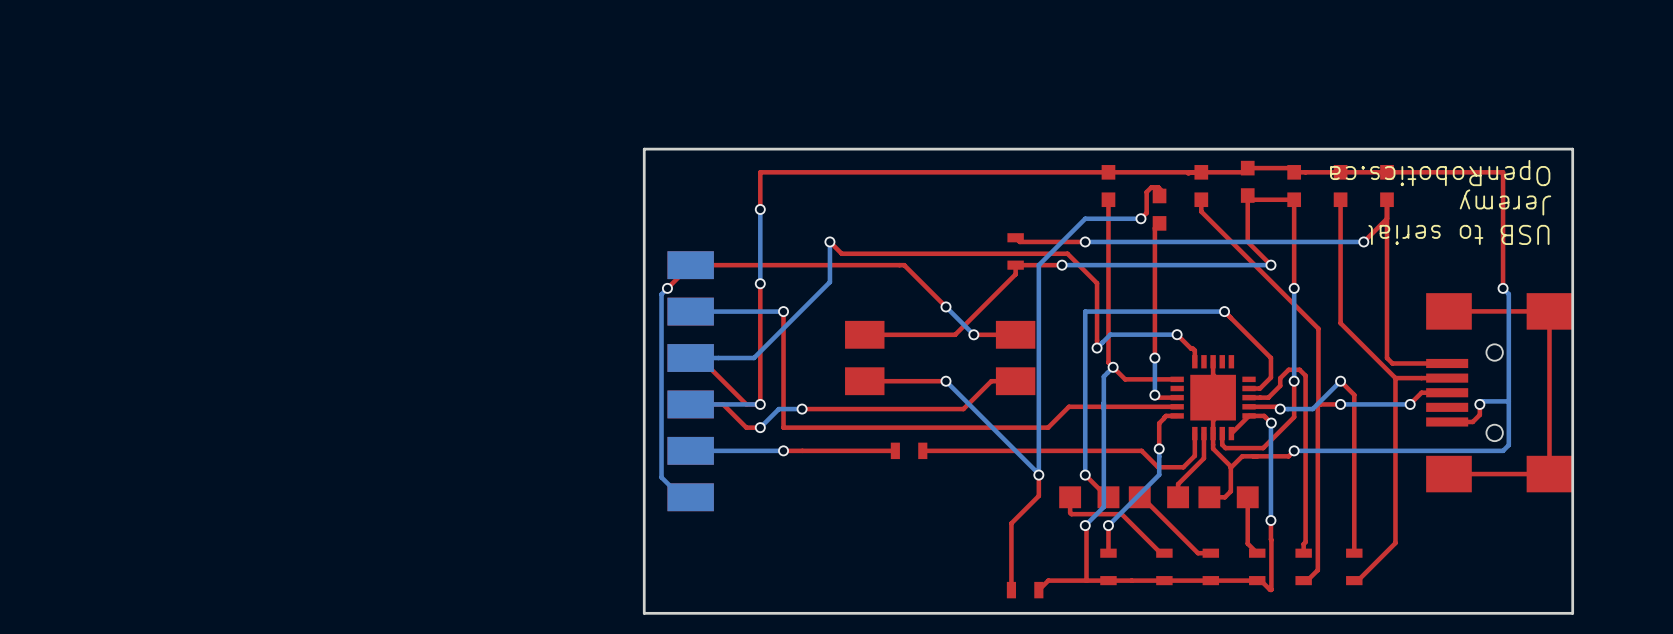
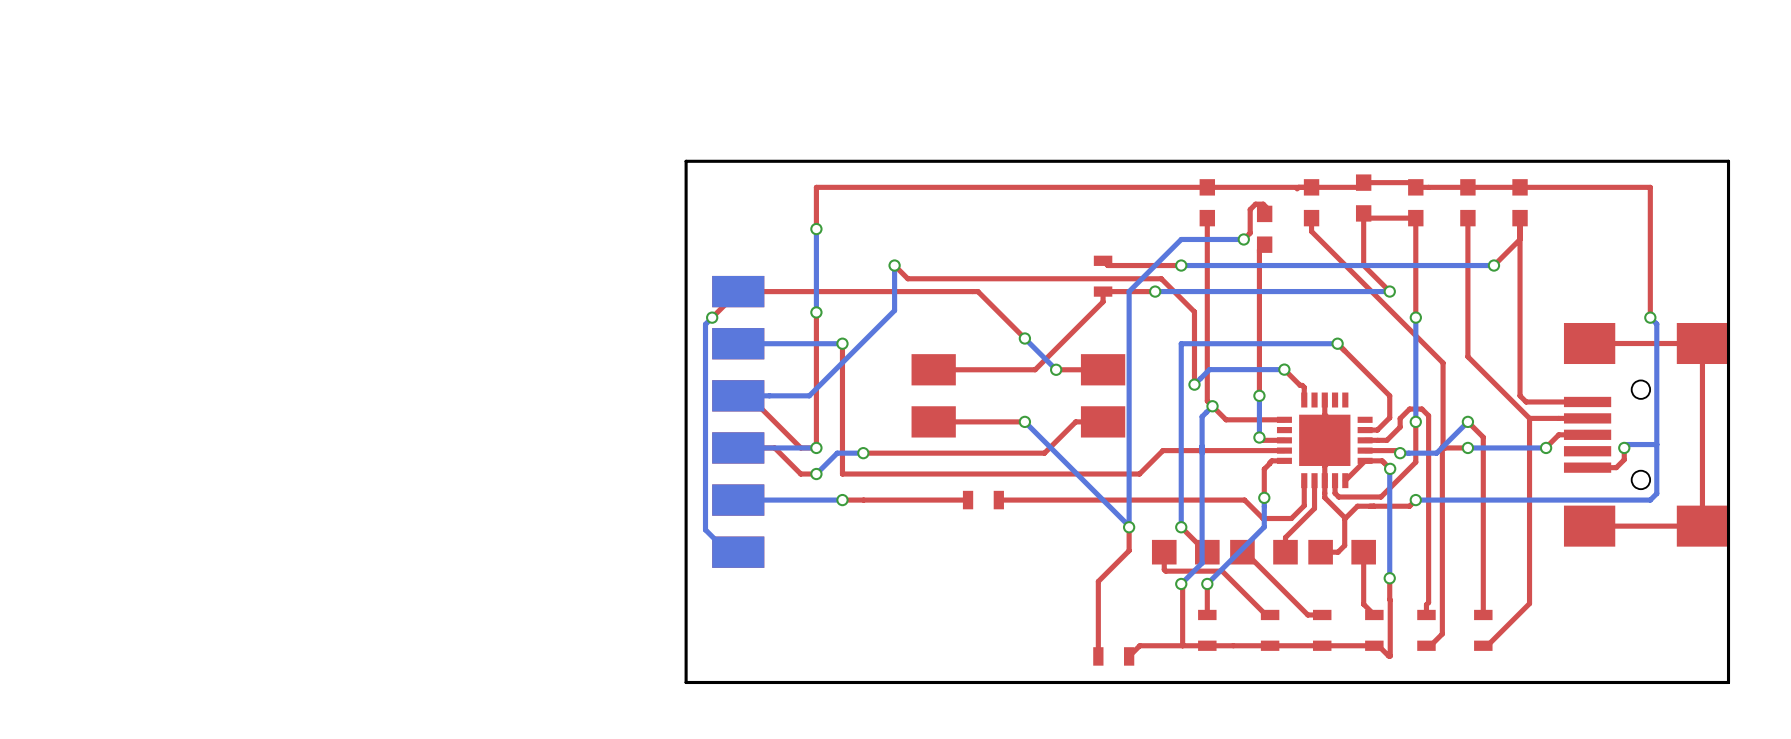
text: OpenRobotics.ca (1440, 173) -> none
text: Jeremy (1505, 202) -> none
text: USB to serial (1458, 234) -> none

